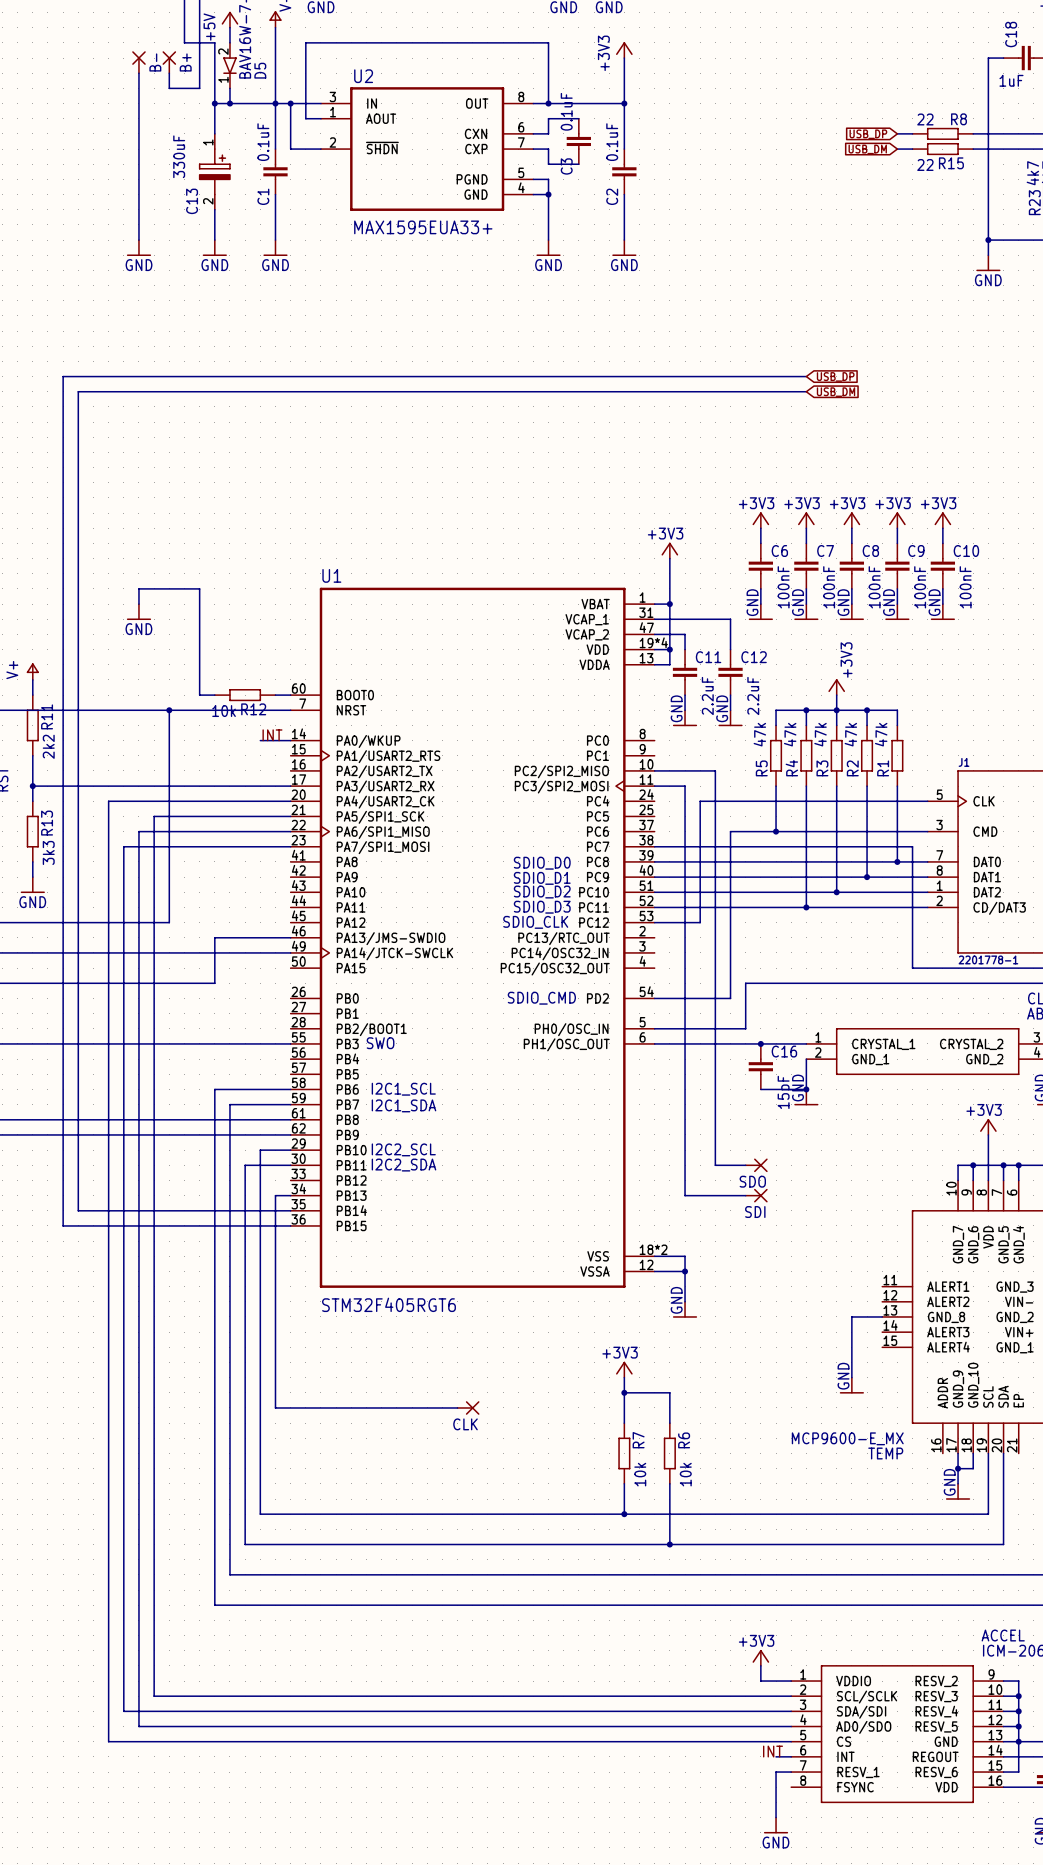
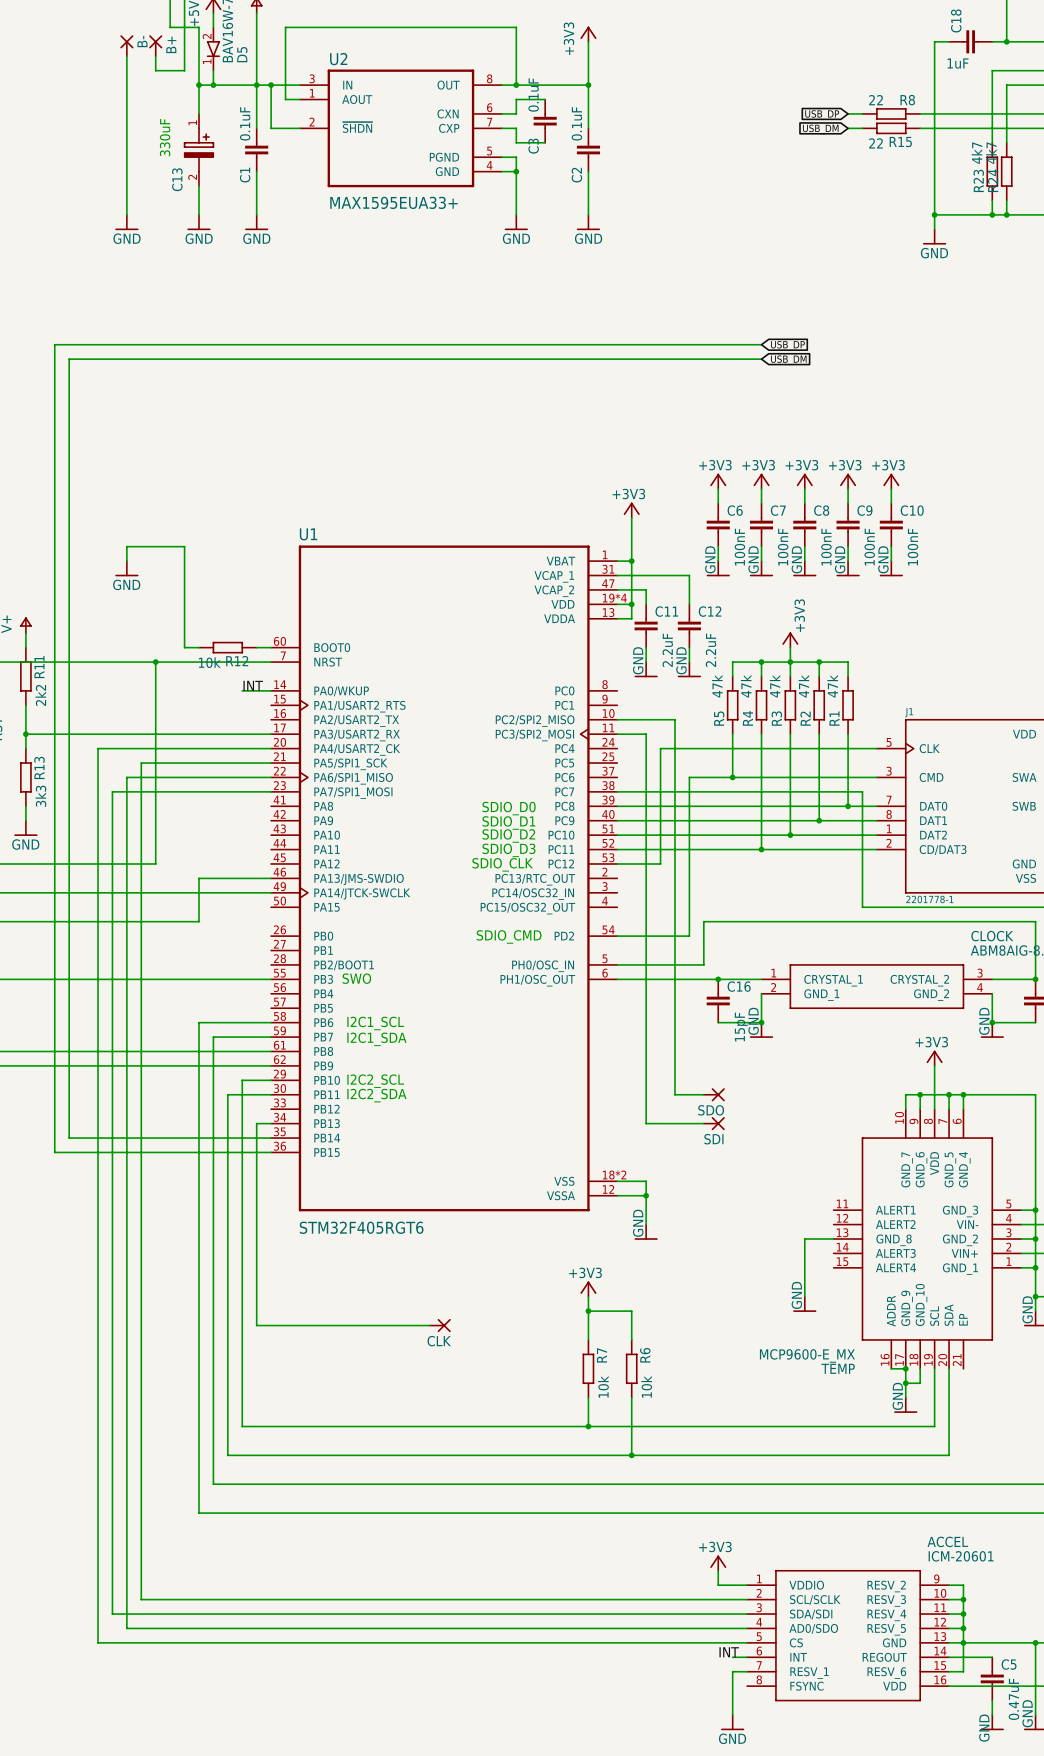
wire: none -> (891, 1368) (905, 1368)
junction: none -> (905, 1368)

